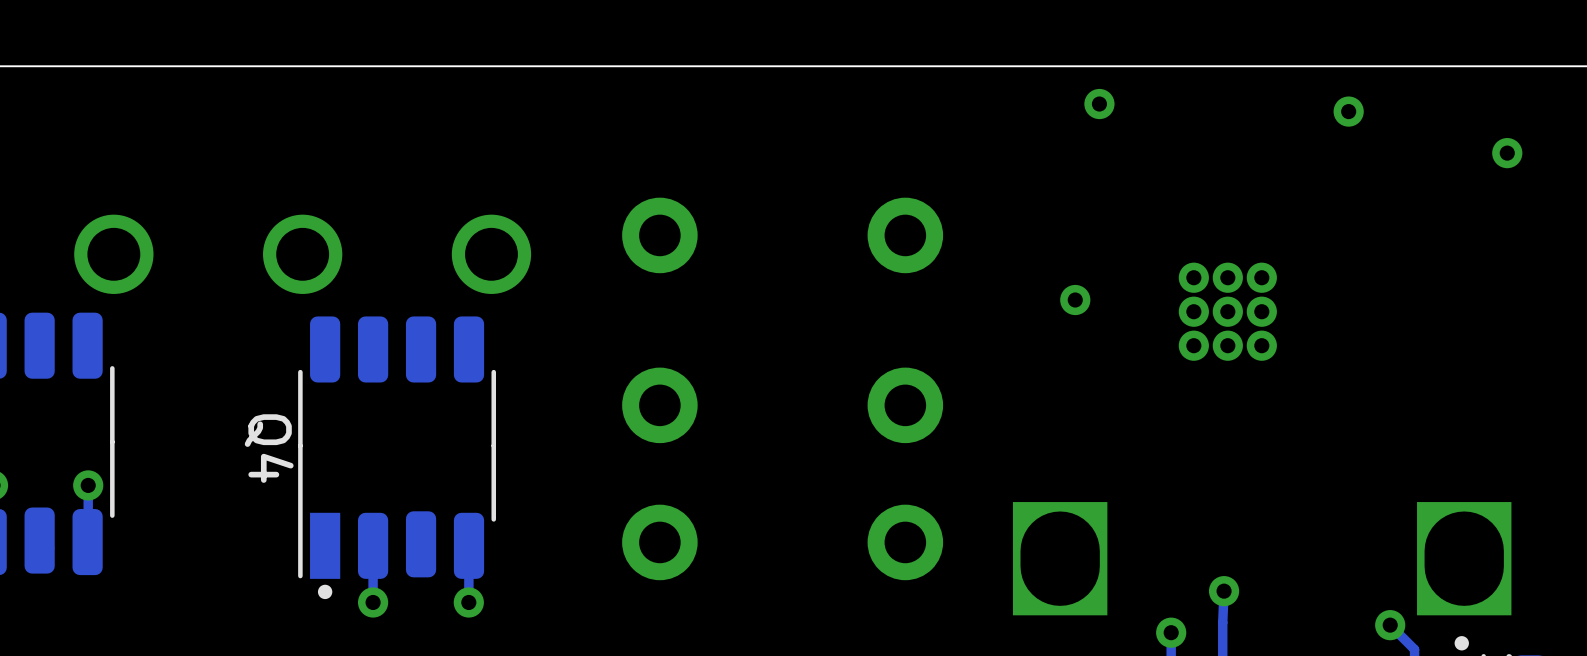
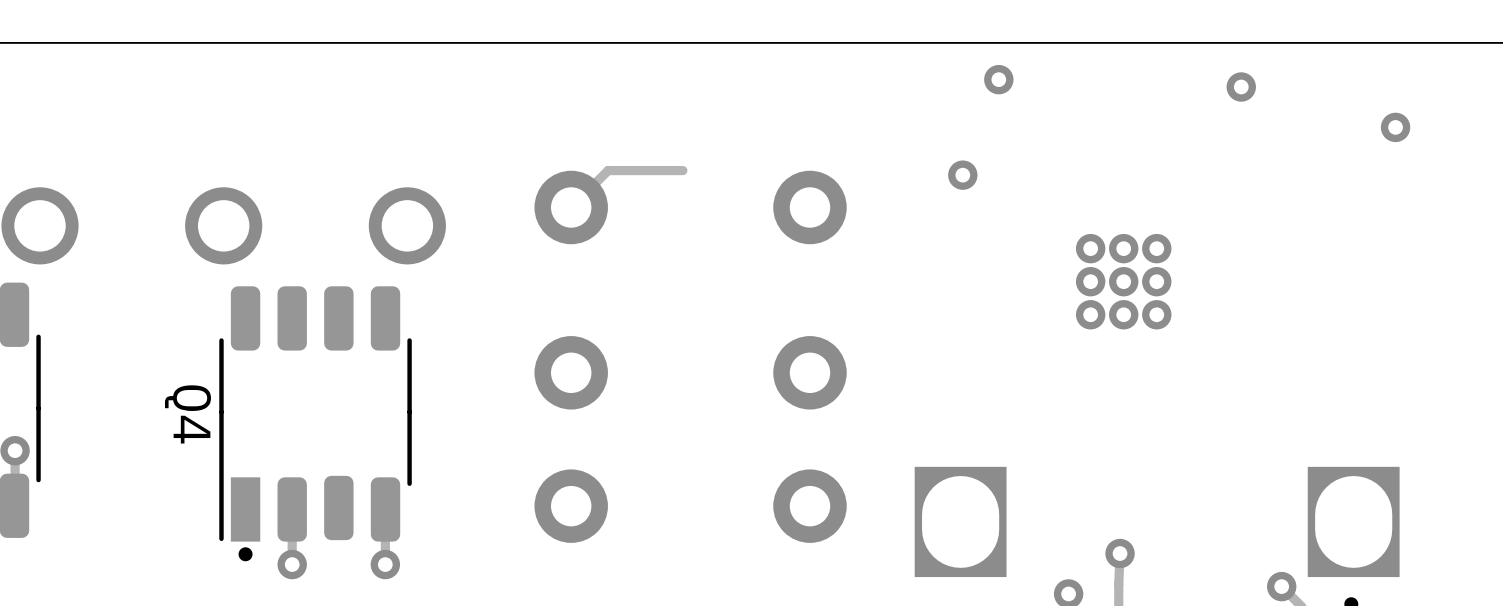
track: none -> (682, 170) (608, 170) (571, 207)
via position: (1075, 300) -> (962, 175)

